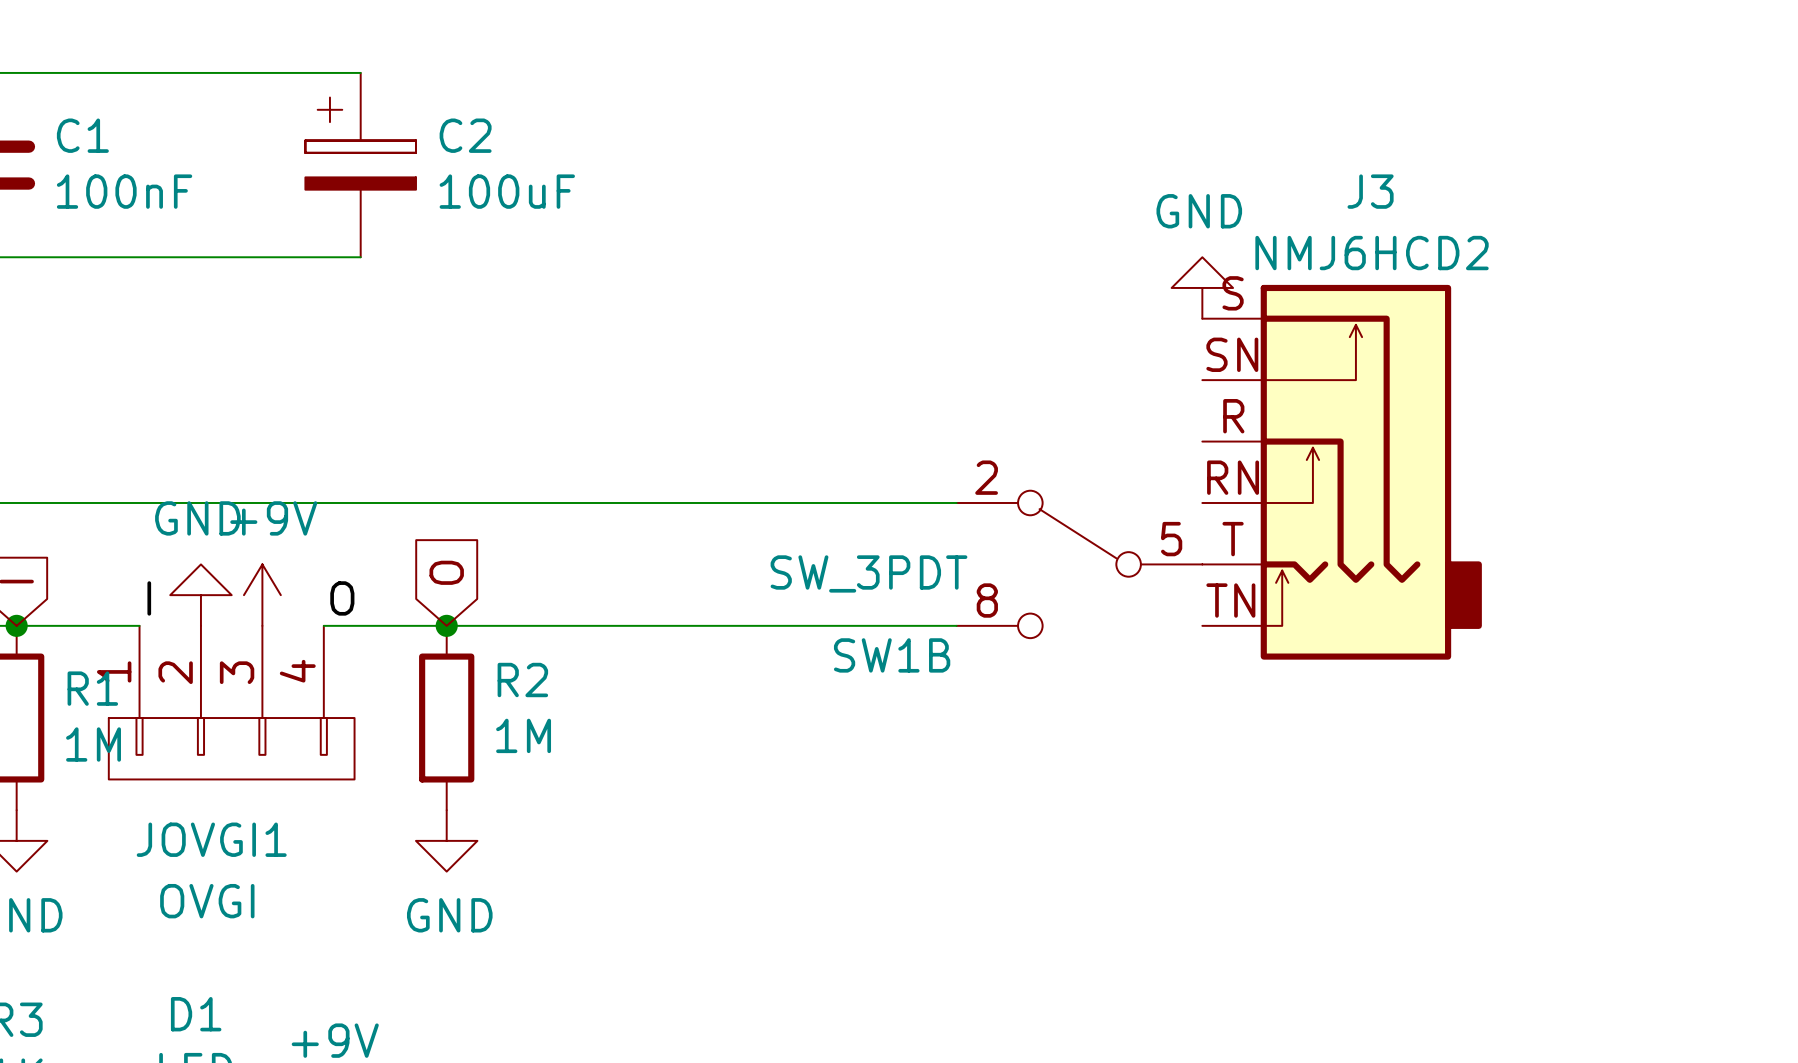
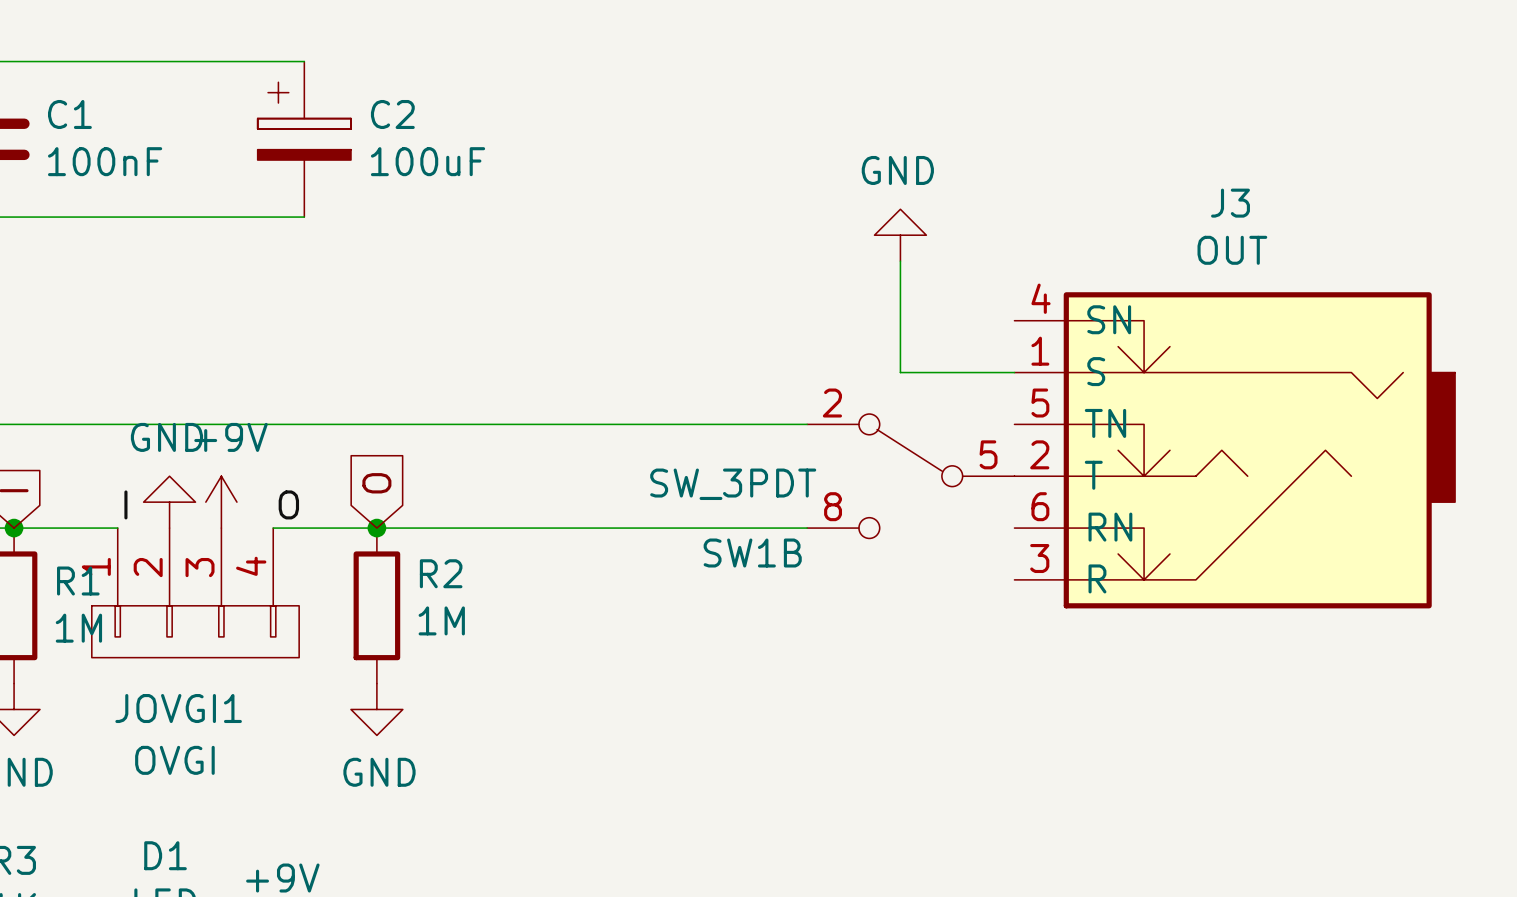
J3 value: NMJ6HCD2 (1372, 253) -> OUT (1232, 250)
J3 symbol: [1202, 284, 1482, 660] -> [1014, 292, 1456, 609]
power symbol position: GND (1202, 287) -> GND (900, 235)
wire: none -> (900, 261) (900, 372) (1014, 372)

